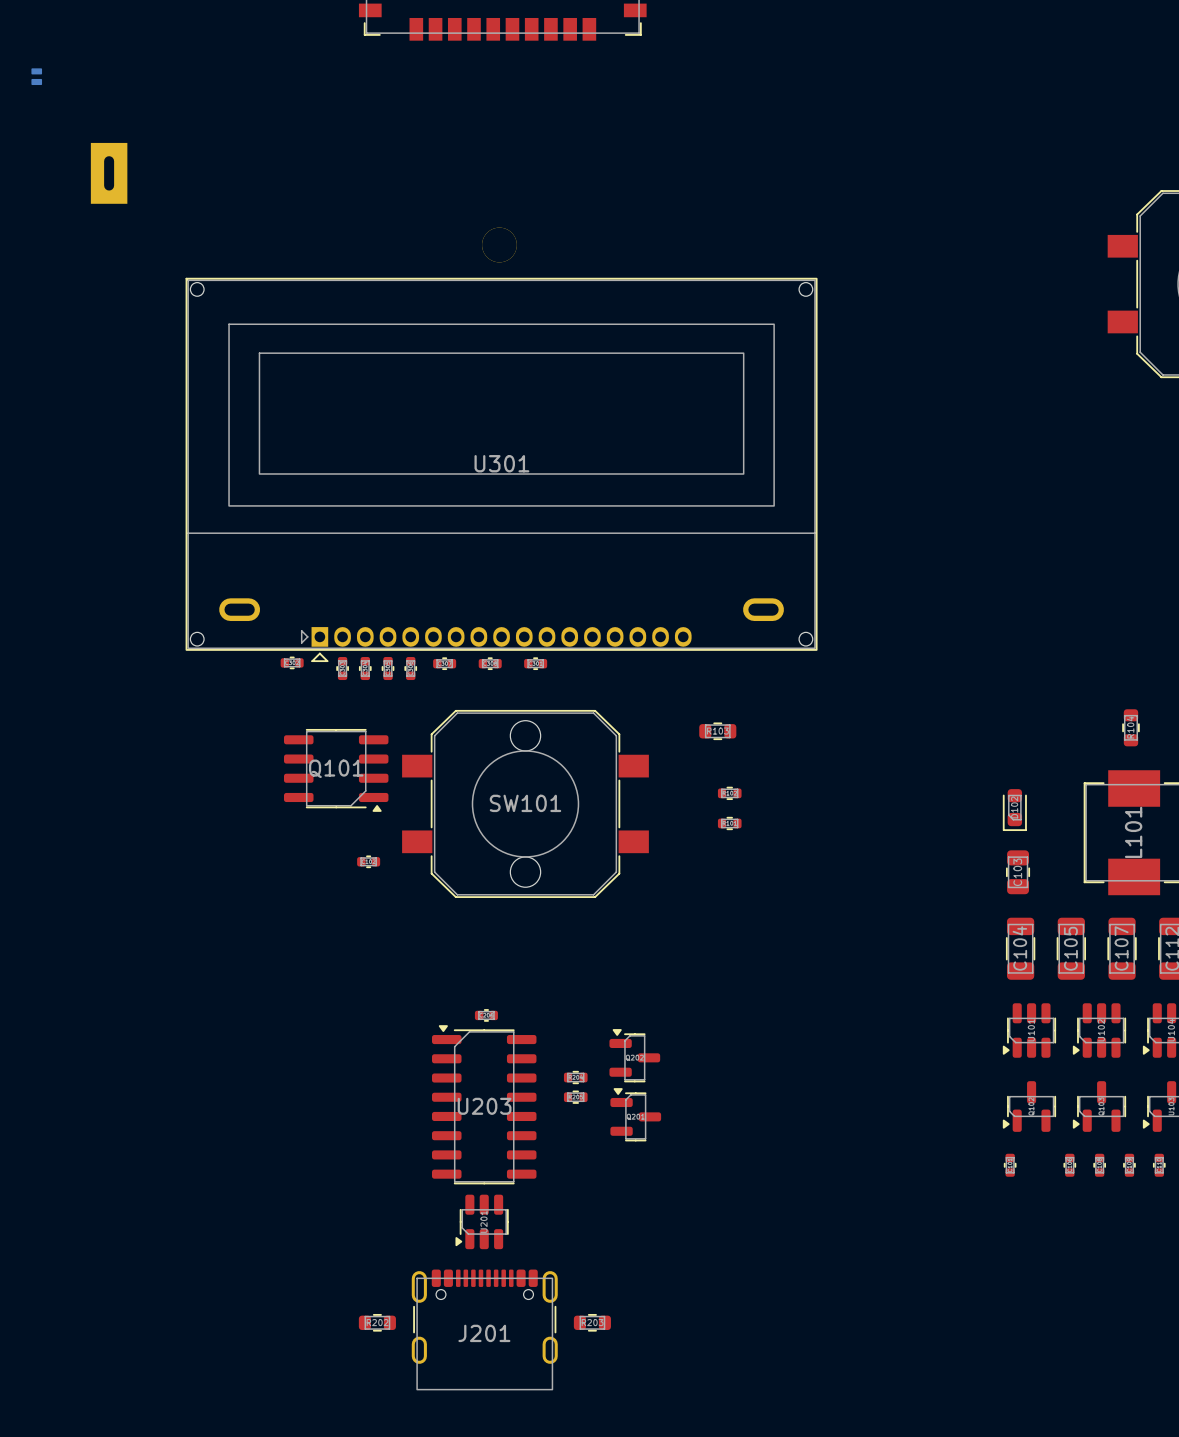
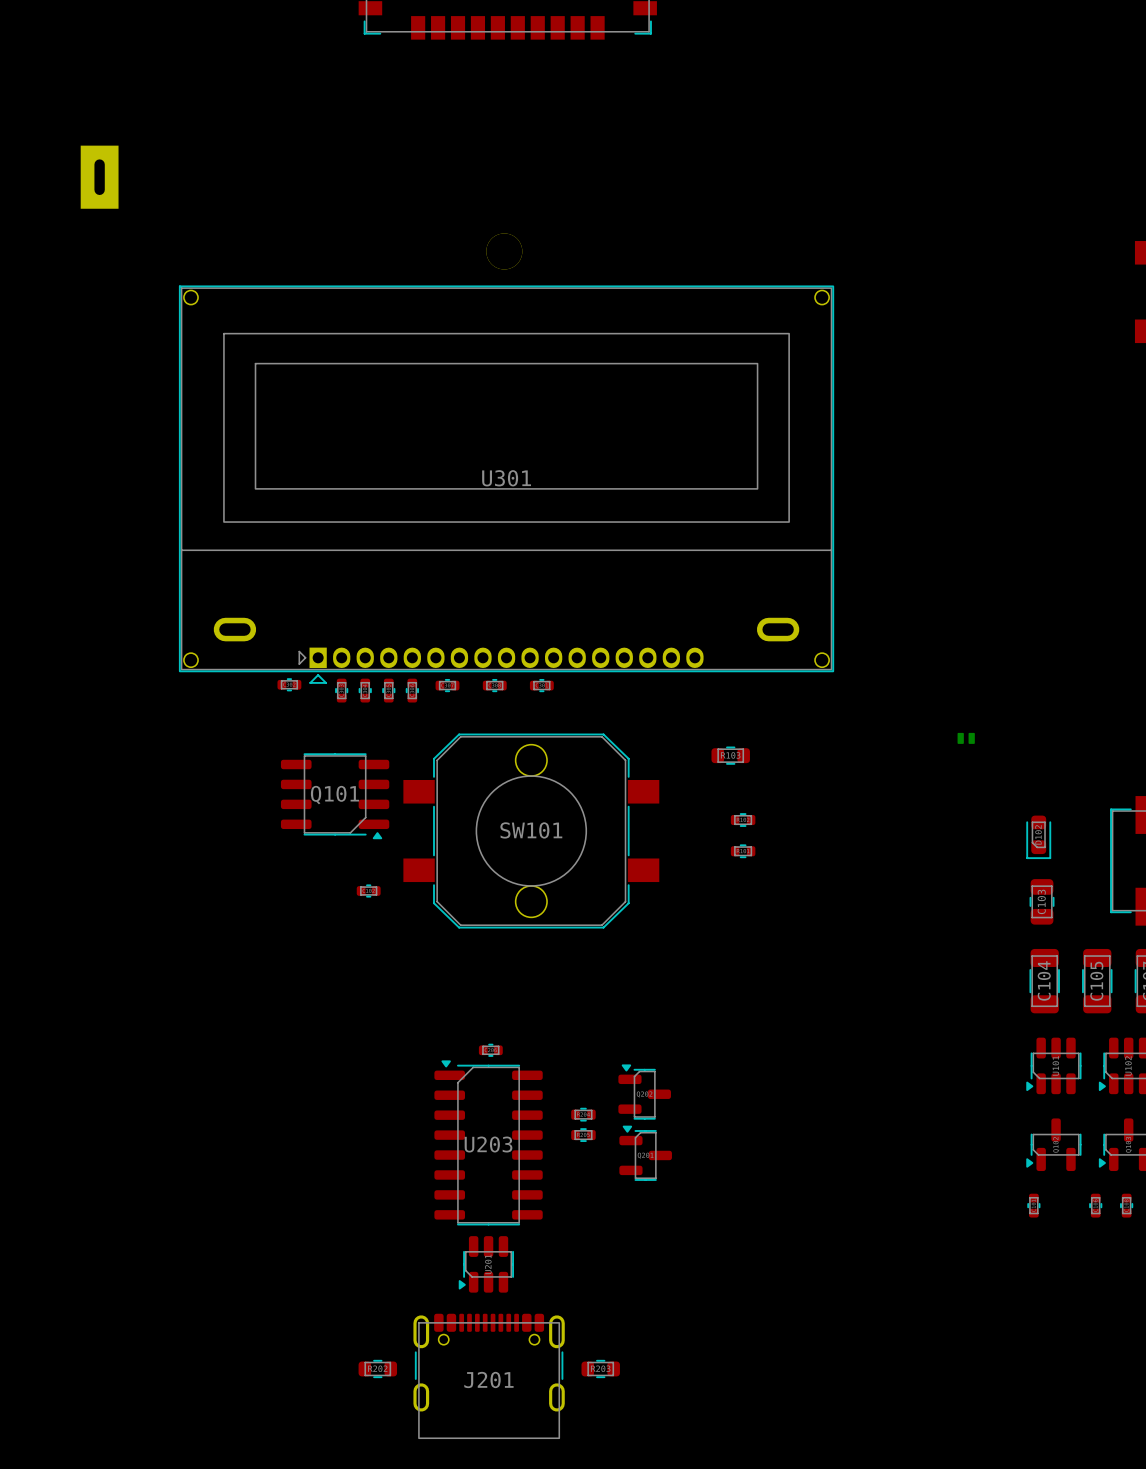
part: (36, 76) -> none
part: none -> (966, 738)

